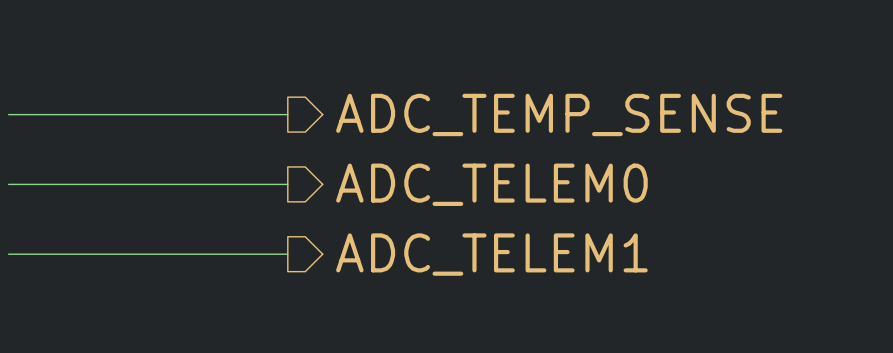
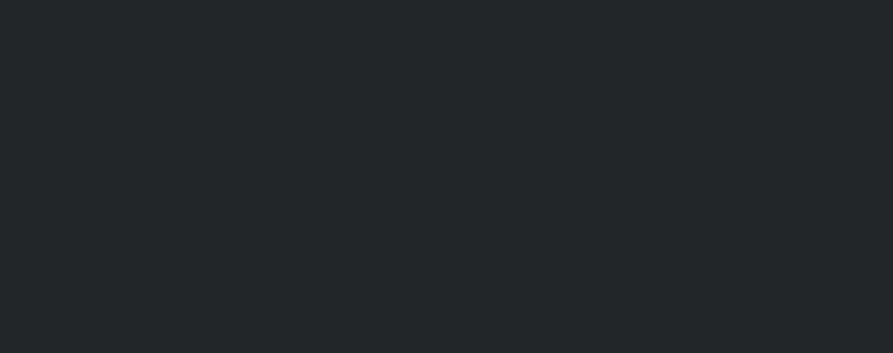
wire: (8, 114) (287, 114) -> none
hierarchical label: ADC_TEMP_SENSE (559, 114) -> none
wire: (8, 184) (287, 184) -> none
hierarchical label: ADC_TELEM0 (491, 184) -> none
wire: (8, 254) (287, 254) -> none
hierarchical label: ADC_TELEM1 (491, 254) -> none

